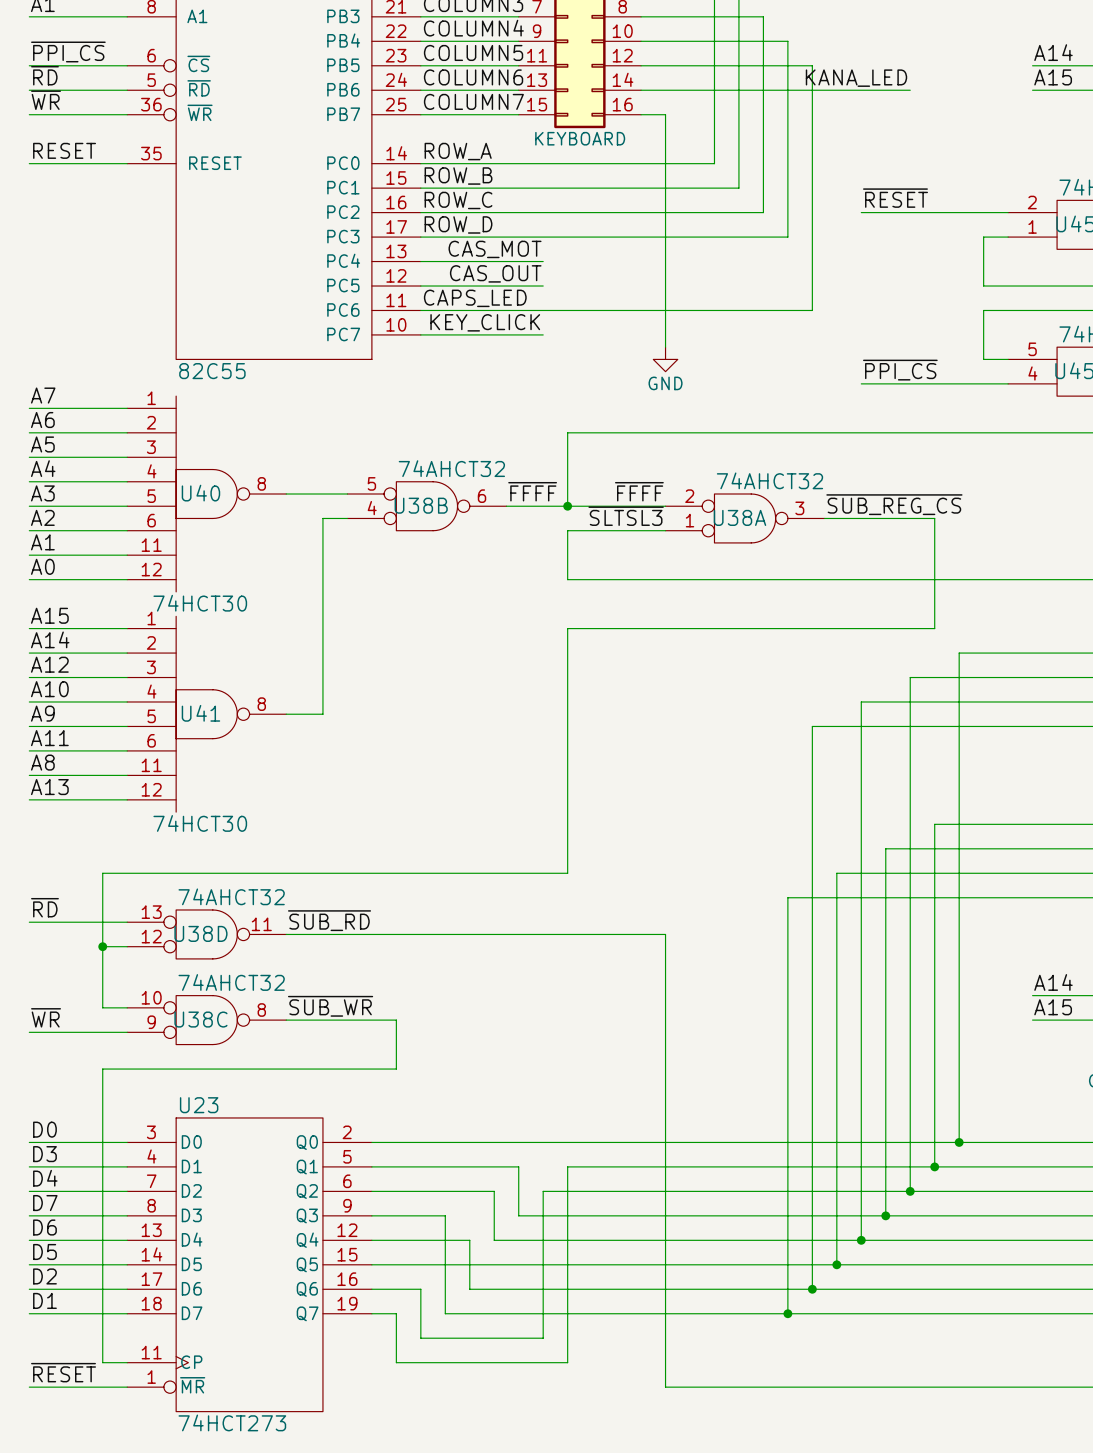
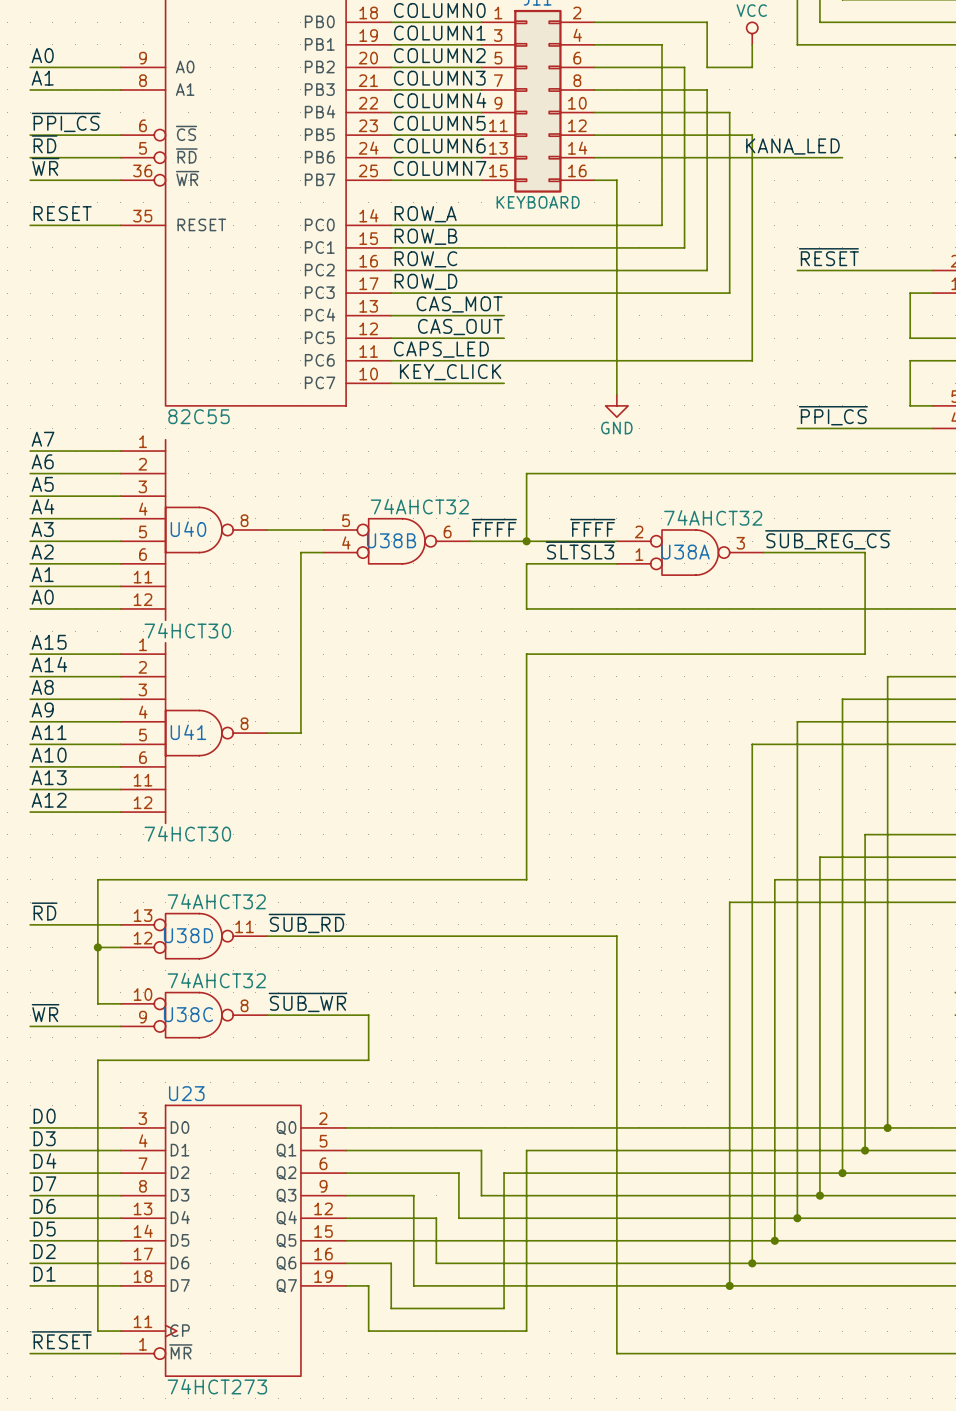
label: A12 (49, 664) -> A8 (42, 687)
label: A10 (49, 689) -> A9 (42, 709)
label: A9 (42, 713) -> A11 (49, 732)
label: A11 (49, 738) -> A10 (49, 755)
label: A8 (42, 762) -> A13 (49, 777)
label: A13 (49, 787) -> A12 (49, 800)

